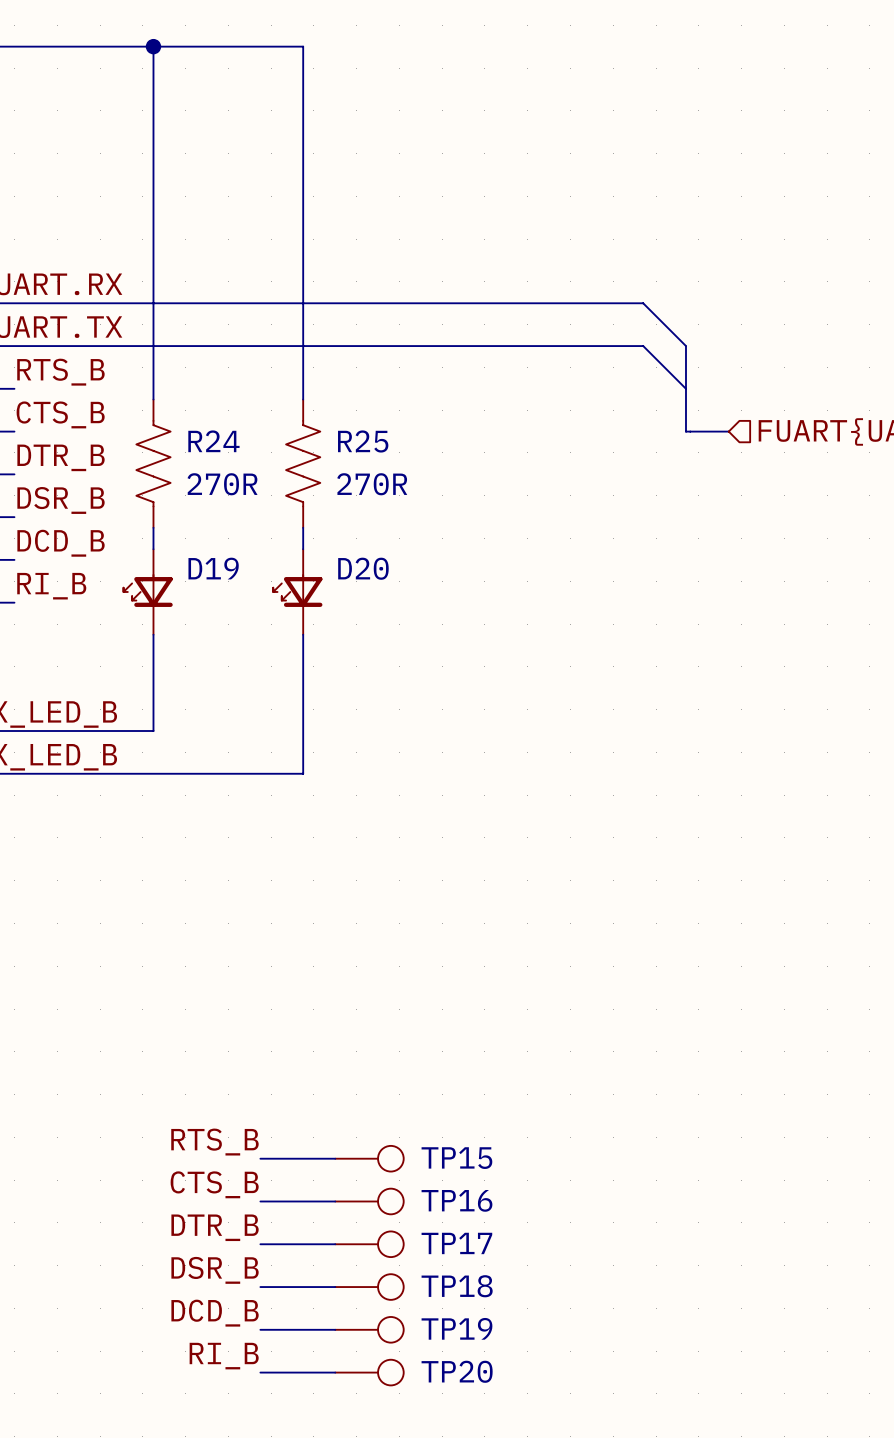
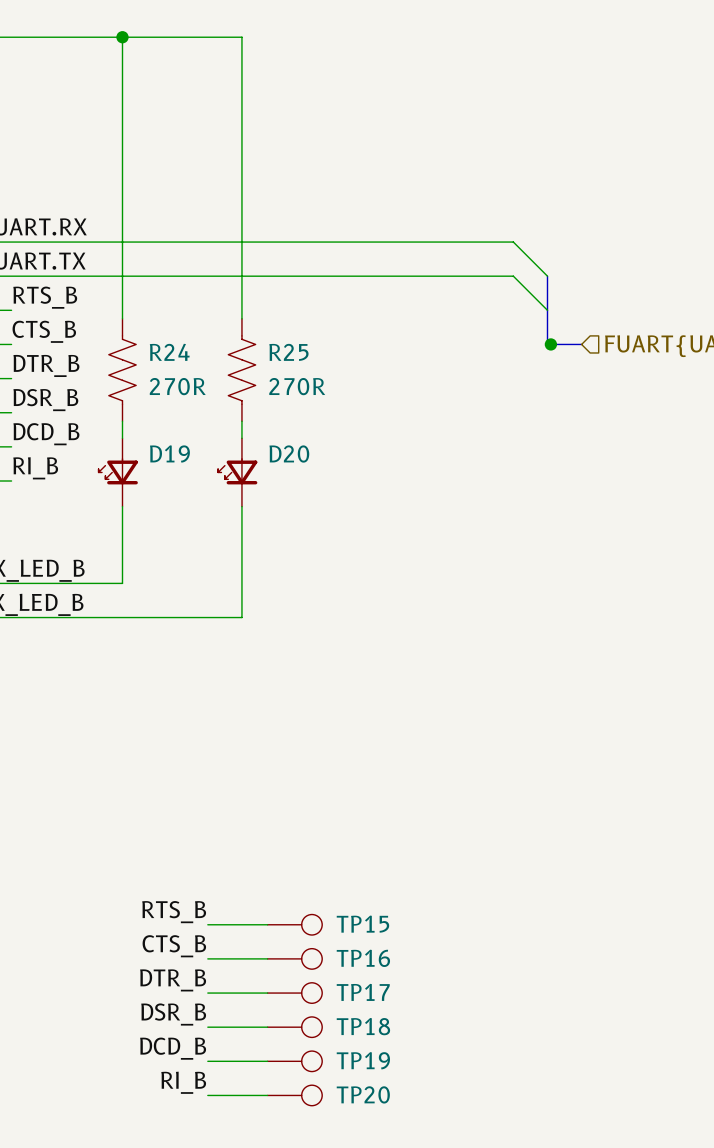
junction: none -> (550, 344)

